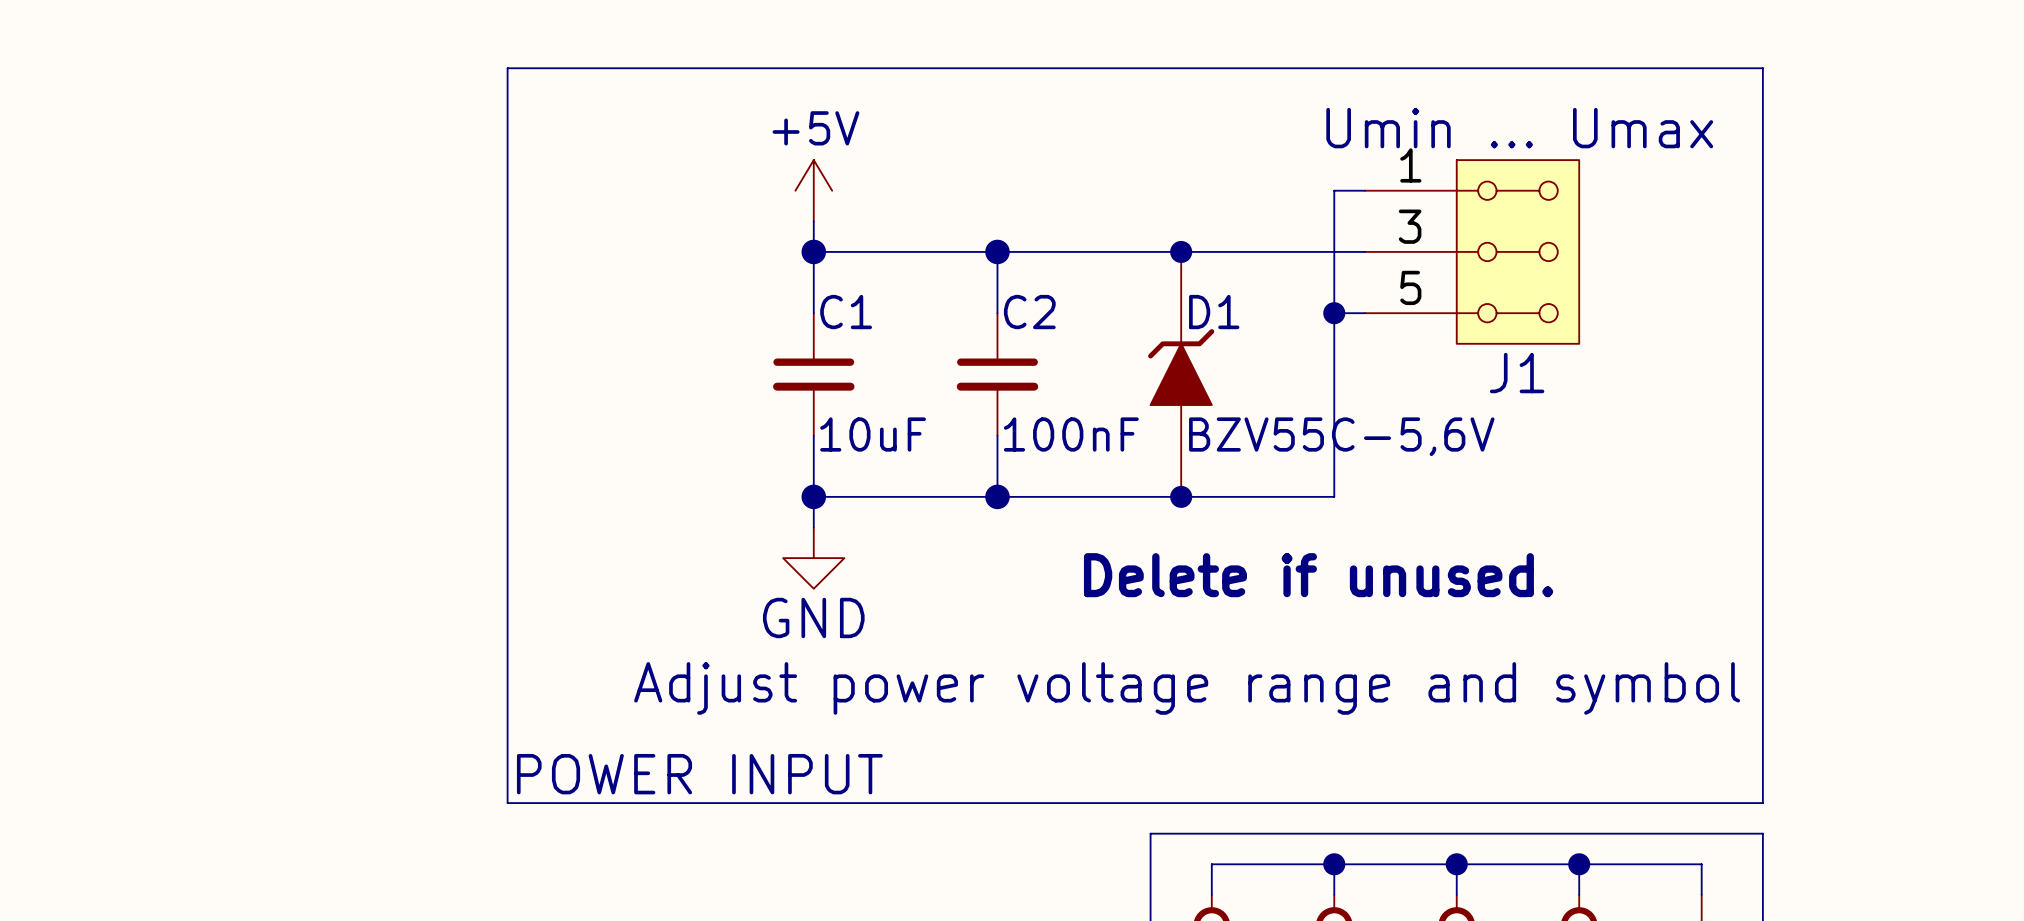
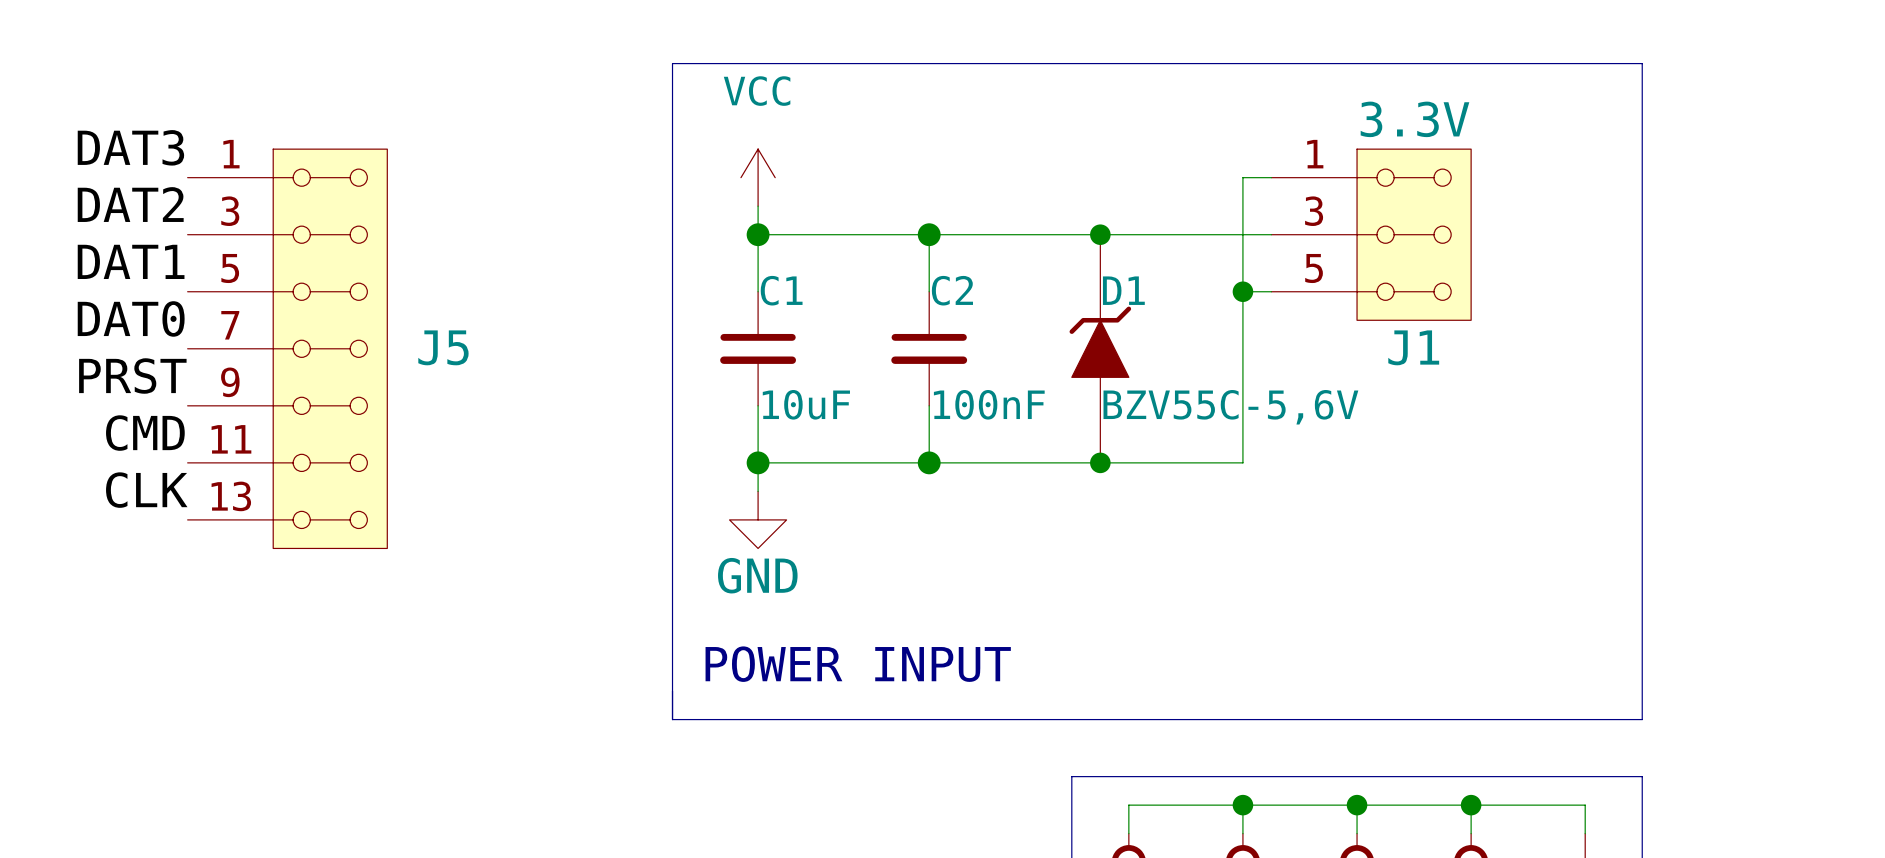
line: (721, 68) (507, 68) (507, 803) (1762, 803) (1762, 772) -> (672, 63) (672, 719) (1642, 719)
J1 value: Umin ... Umax (1519, 128) -> 3.3V (1414, 119)
label: none -> DAT3 (130, 147)
power symbol: +5V (813, 190) -> VCC (758, 177)
label: none -> DAT2 (130, 204)
label: none -> DAT1 (131, 261)
label: none -> DAT0 (131, 318)
J5: none -> (287, 348)
label: none -> PRST (132, 376)
label: none -> CMD (145, 433)
label: none -> CLK (146, 490)
text: Delete if unused. (1318, 575) -> none
text: Adjust power voltage range and symbol (1187, 688) -> none
text position: POWER INPUT (699, 774) -> POWER INPUT (858, 664)

